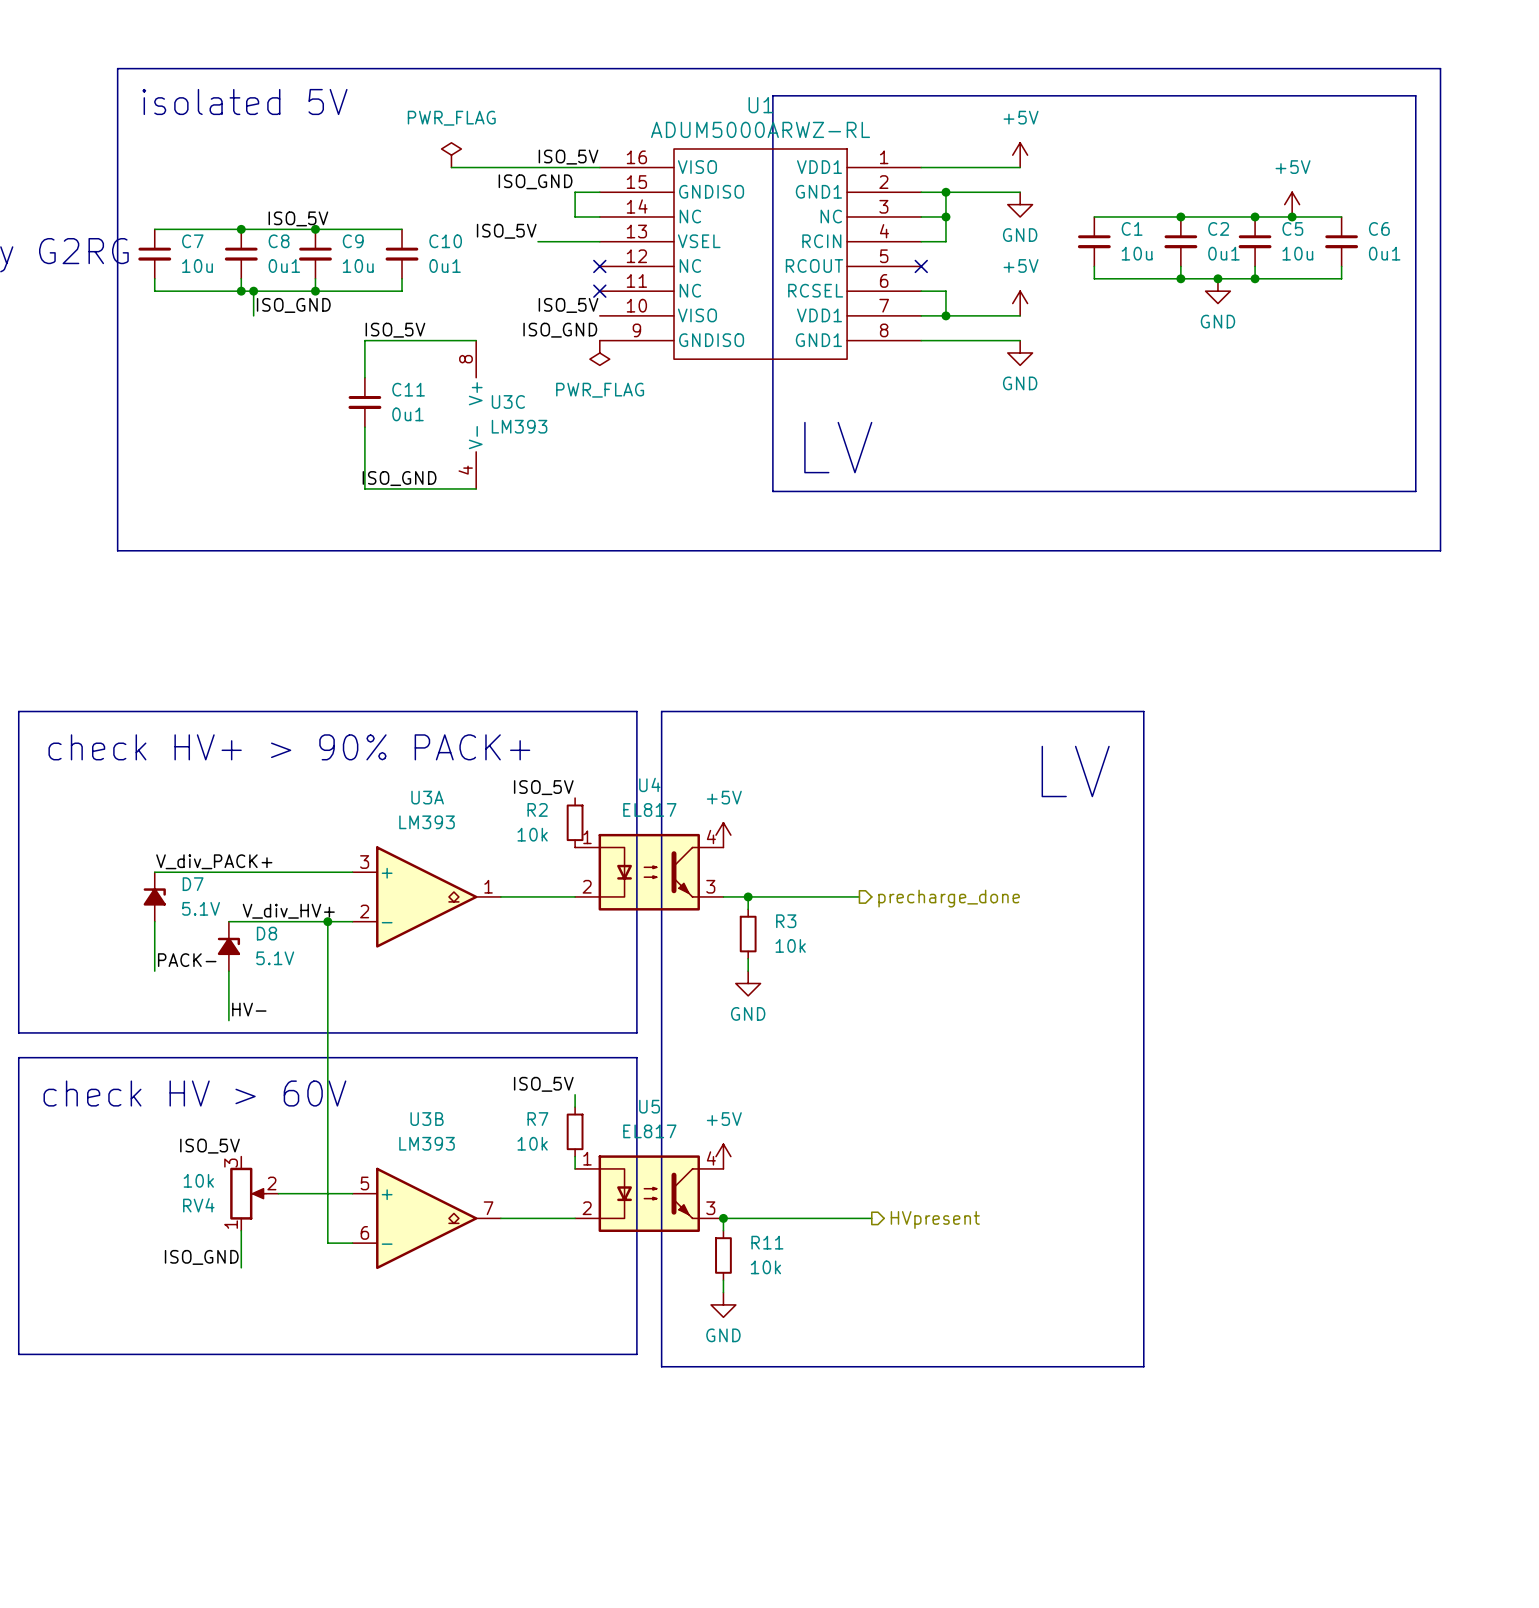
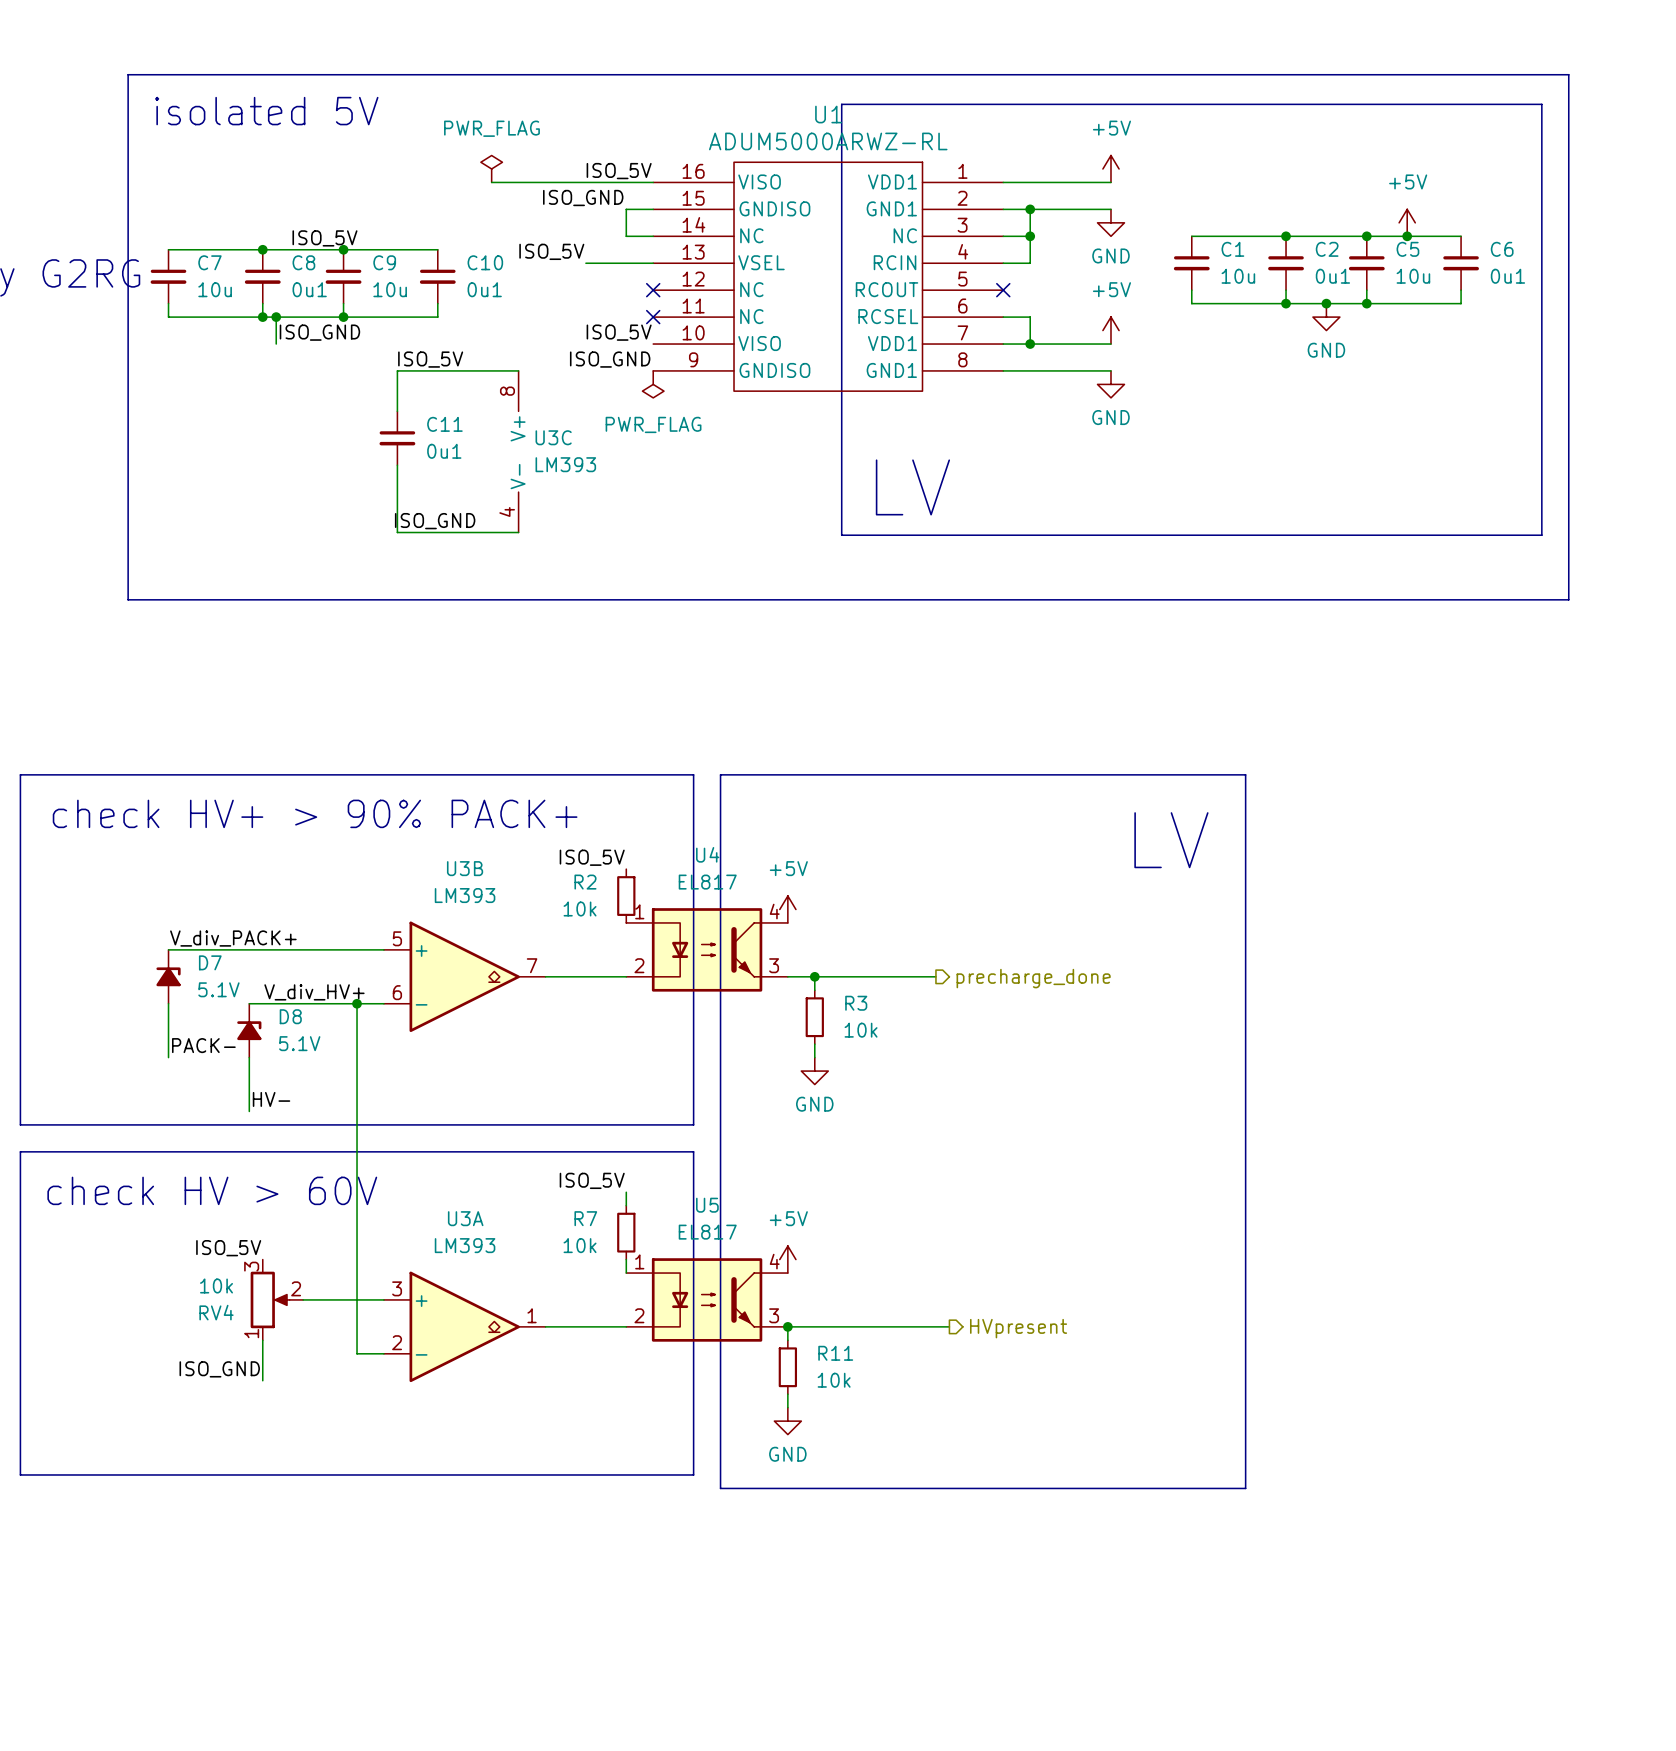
U3A position: (426, 896) -> (464, 1326)
U3B position: (426, 1218) -> (464, 976)

